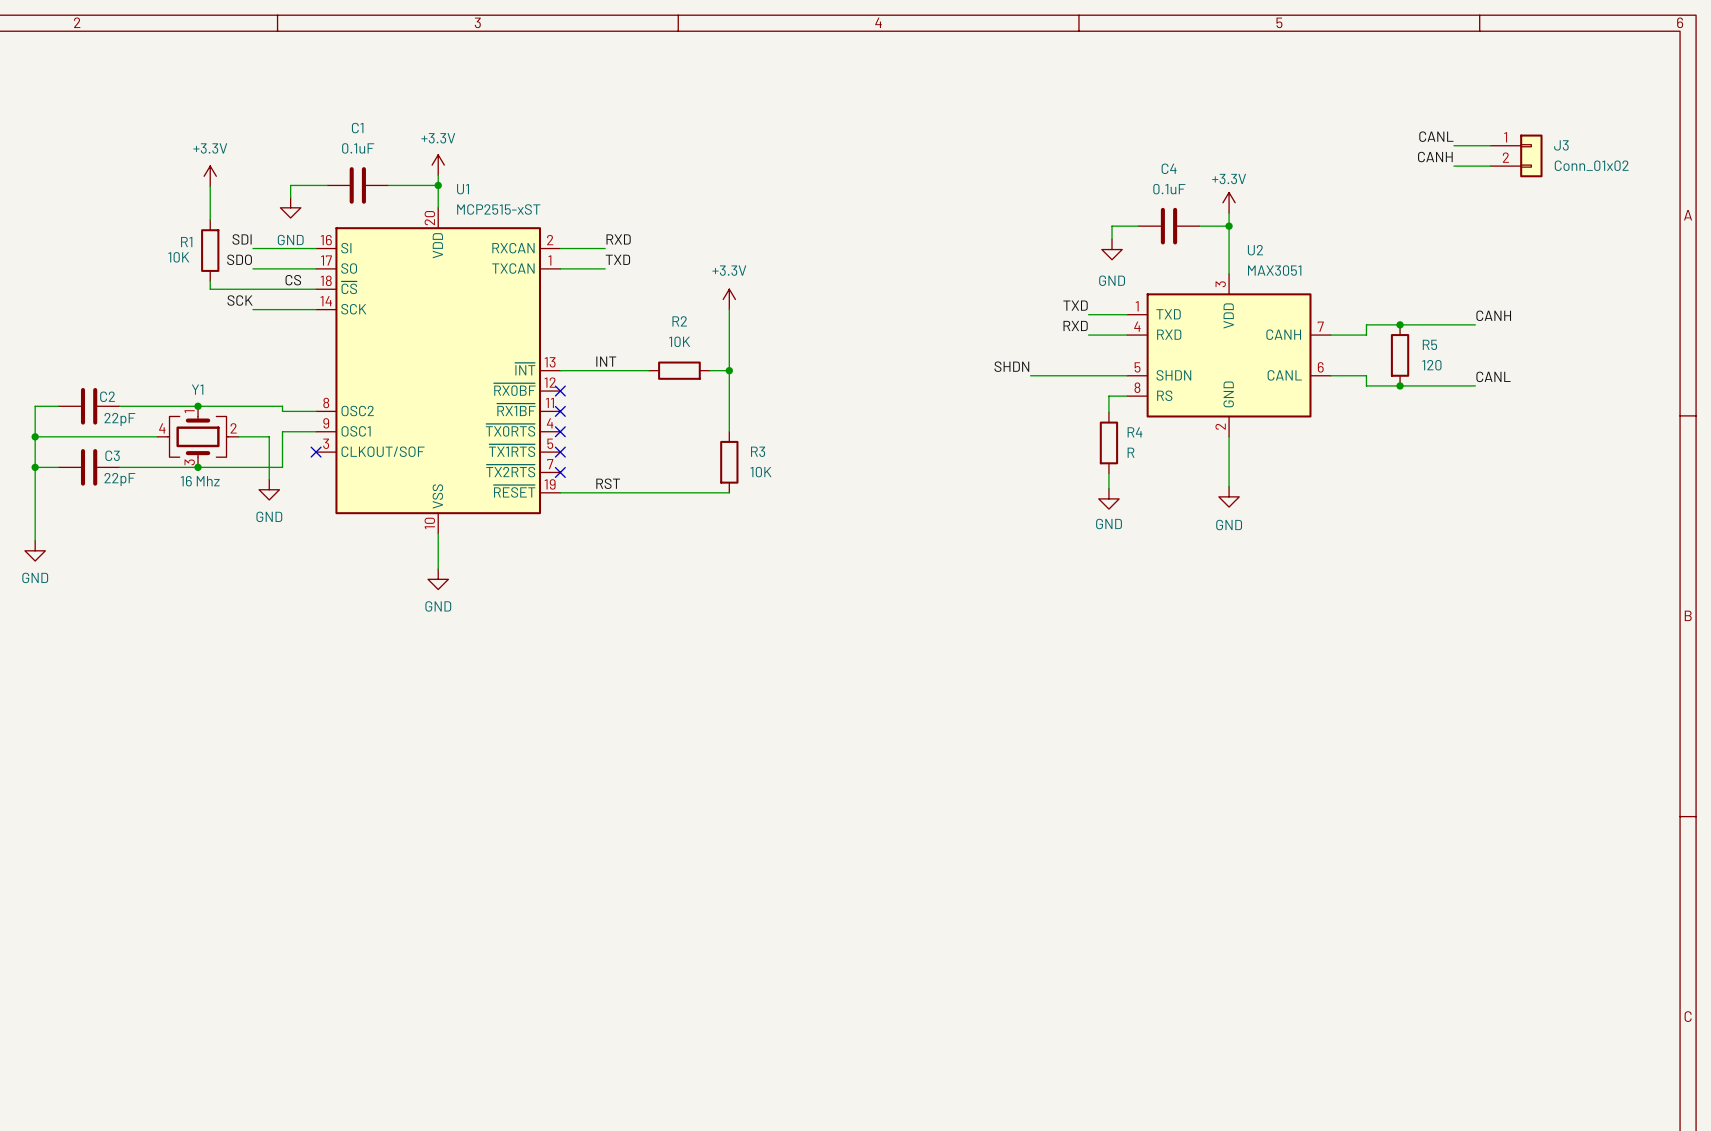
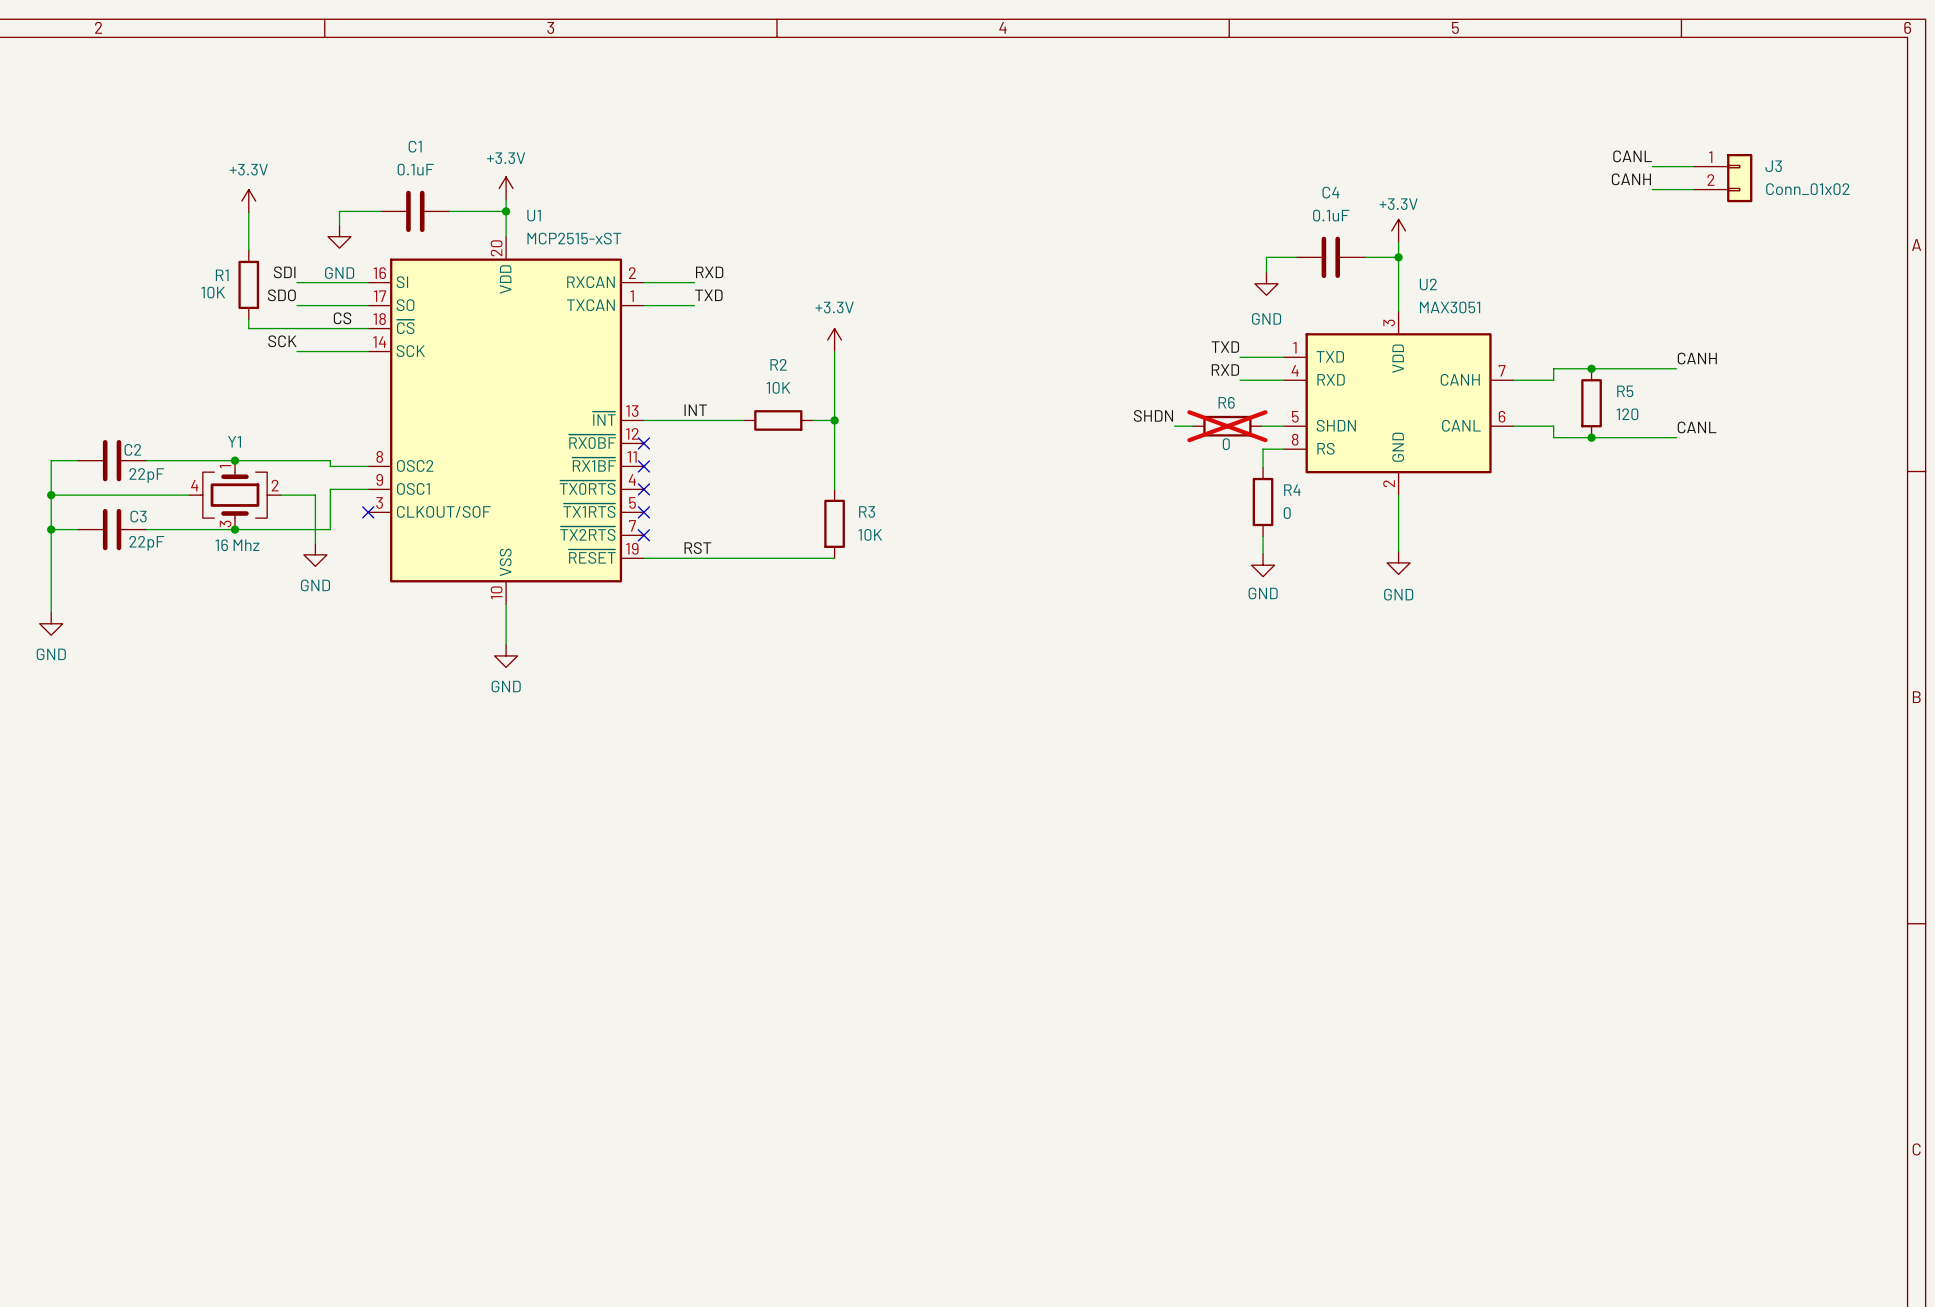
R6: none -> 0 (1227, 426)
R4 value: R (1131, 452) -> 0 (1287, 513)

